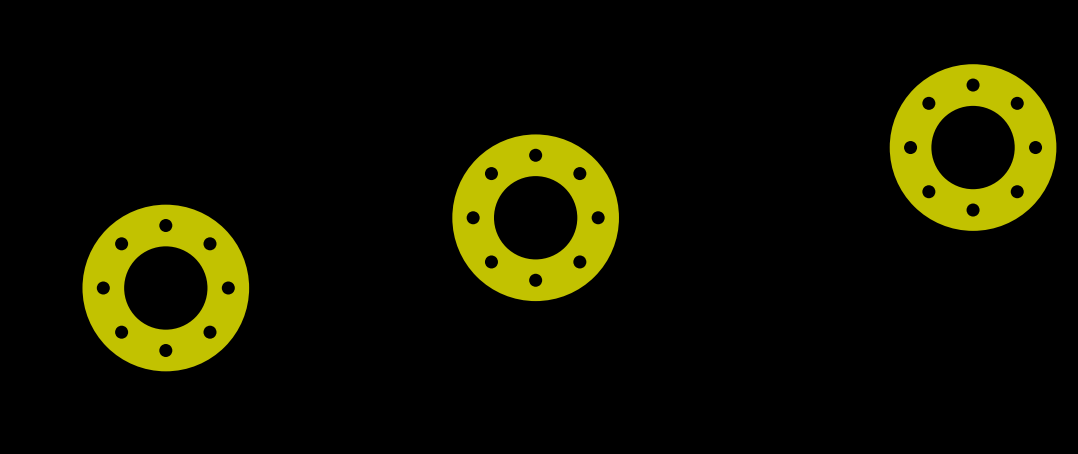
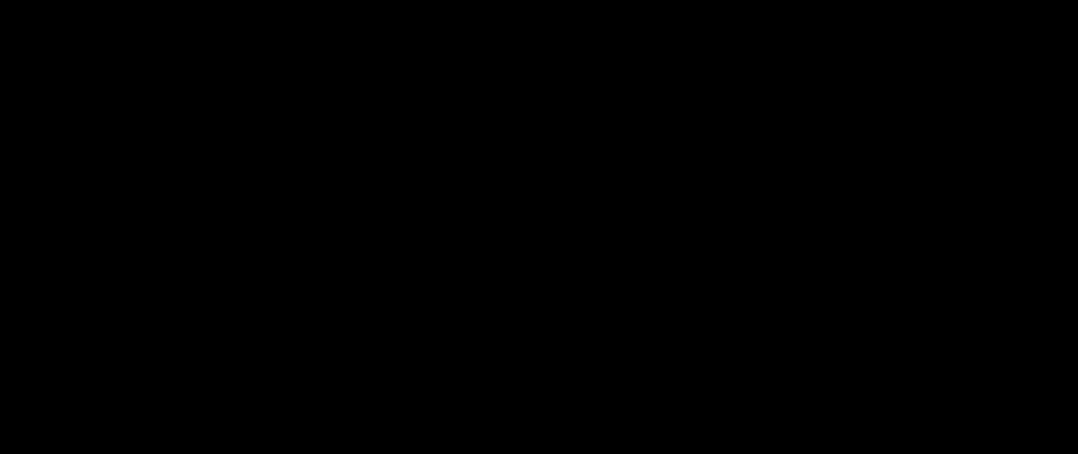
part: (973, 147) -> none
part: (535, 217) -> none
part: (165, 288) -> none

